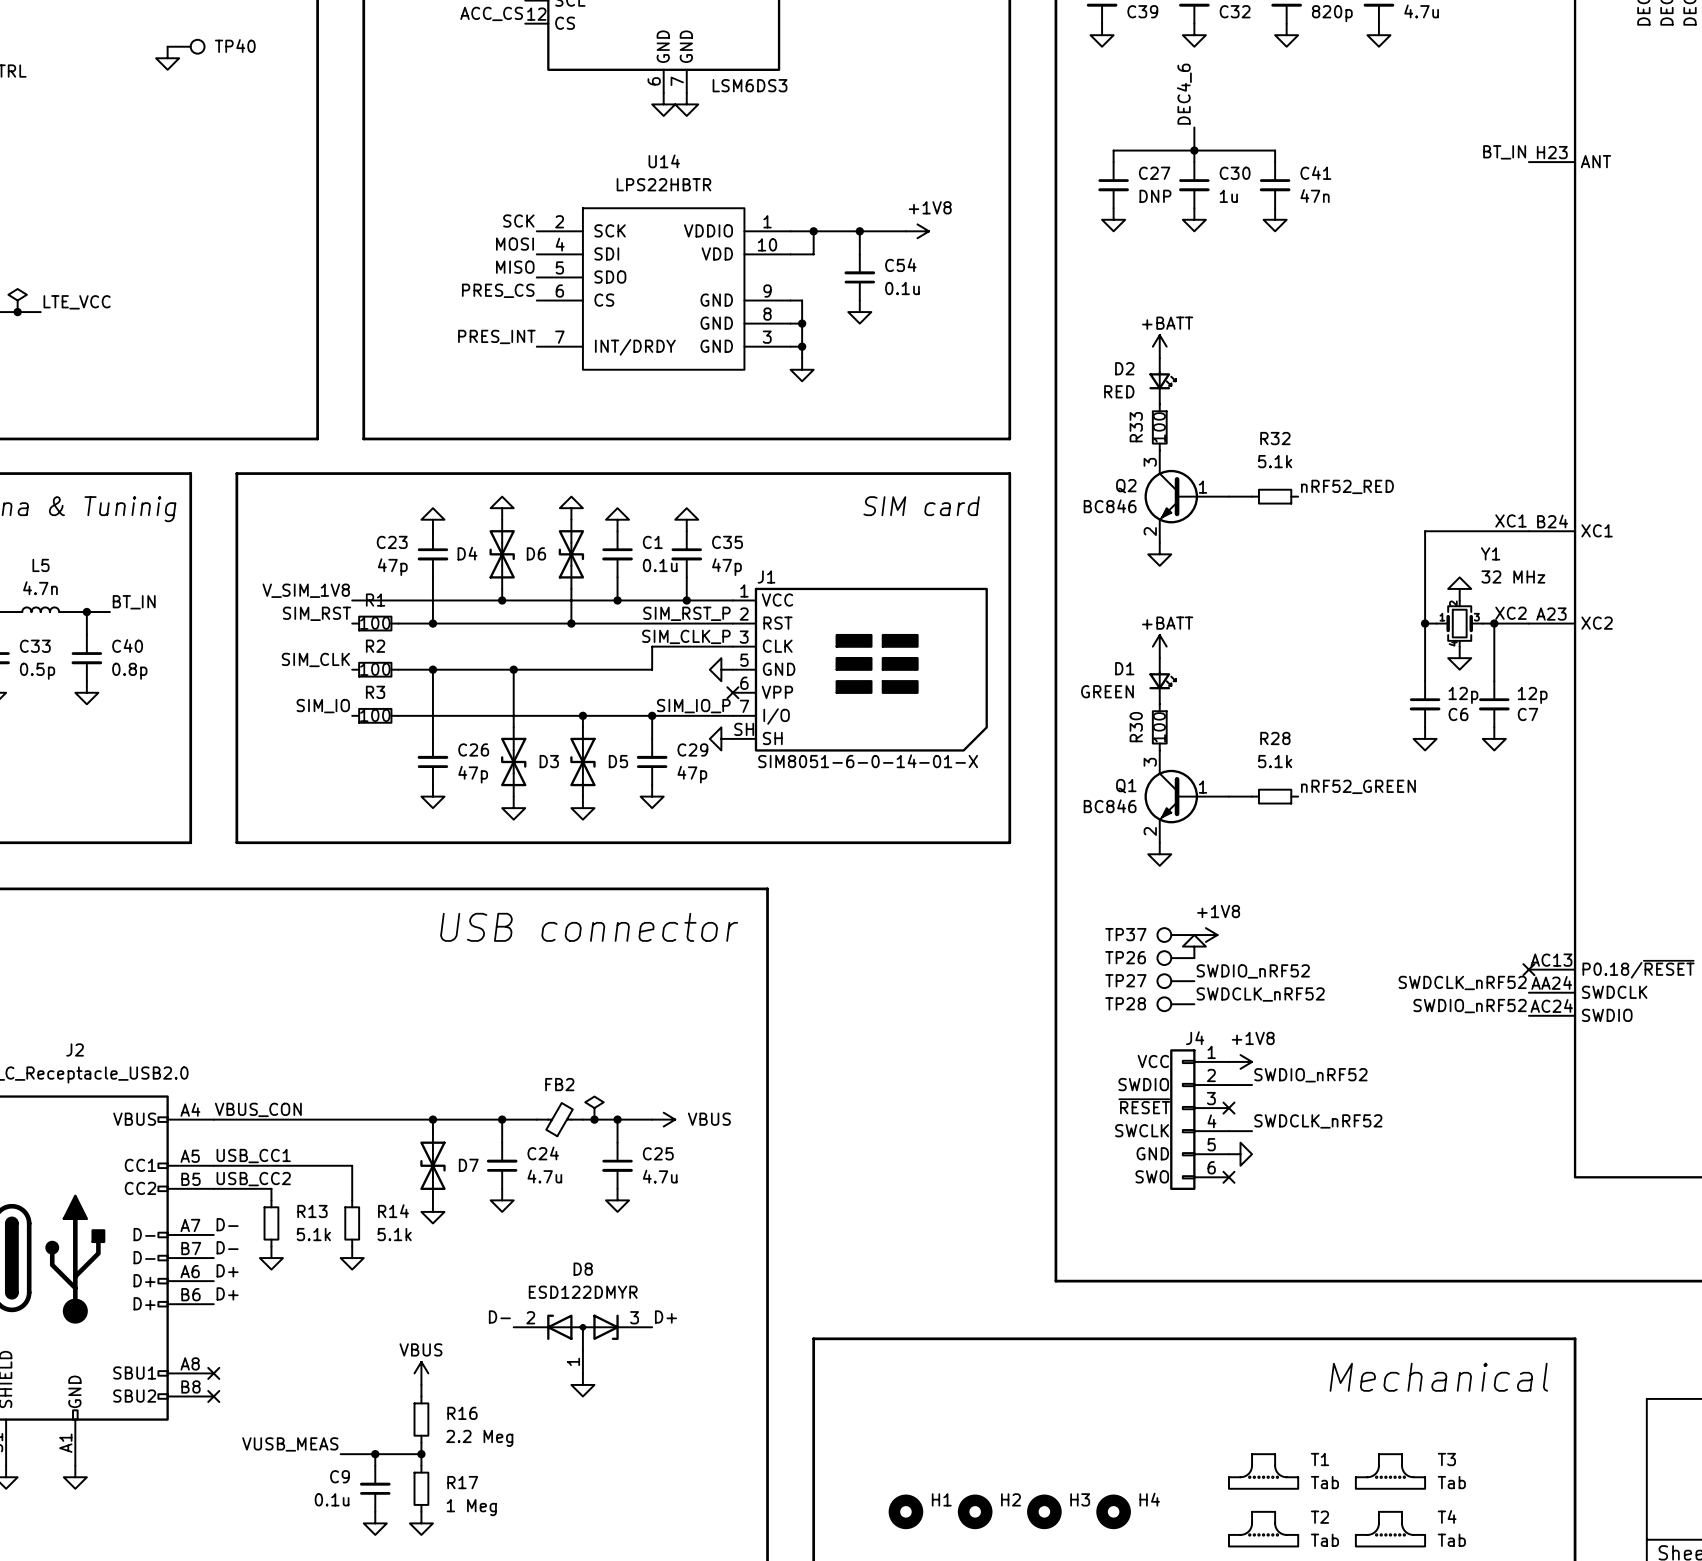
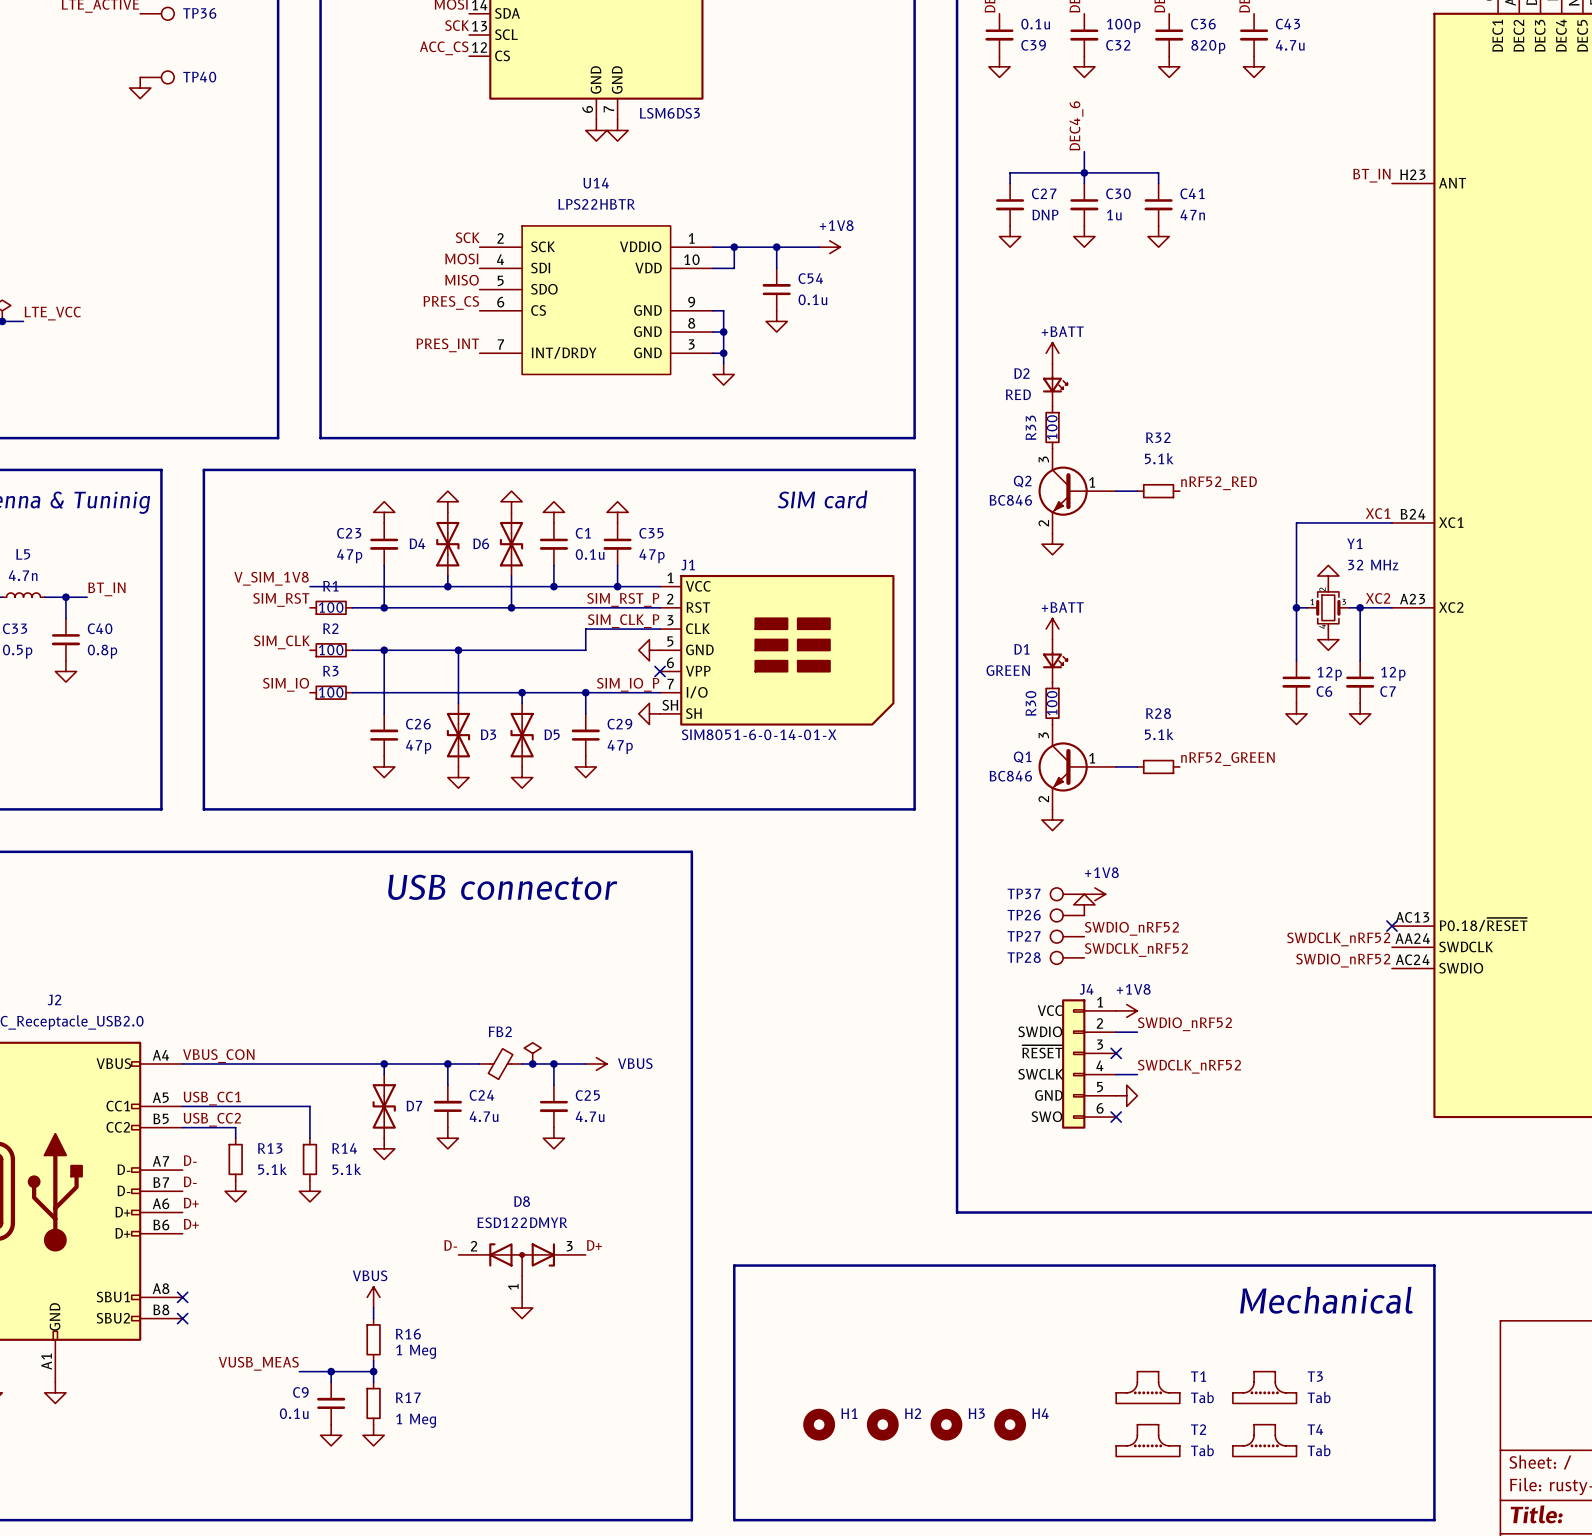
R16 value: 2.2 Meg (479, 1438) -> 1 Meg (416, 1351)

